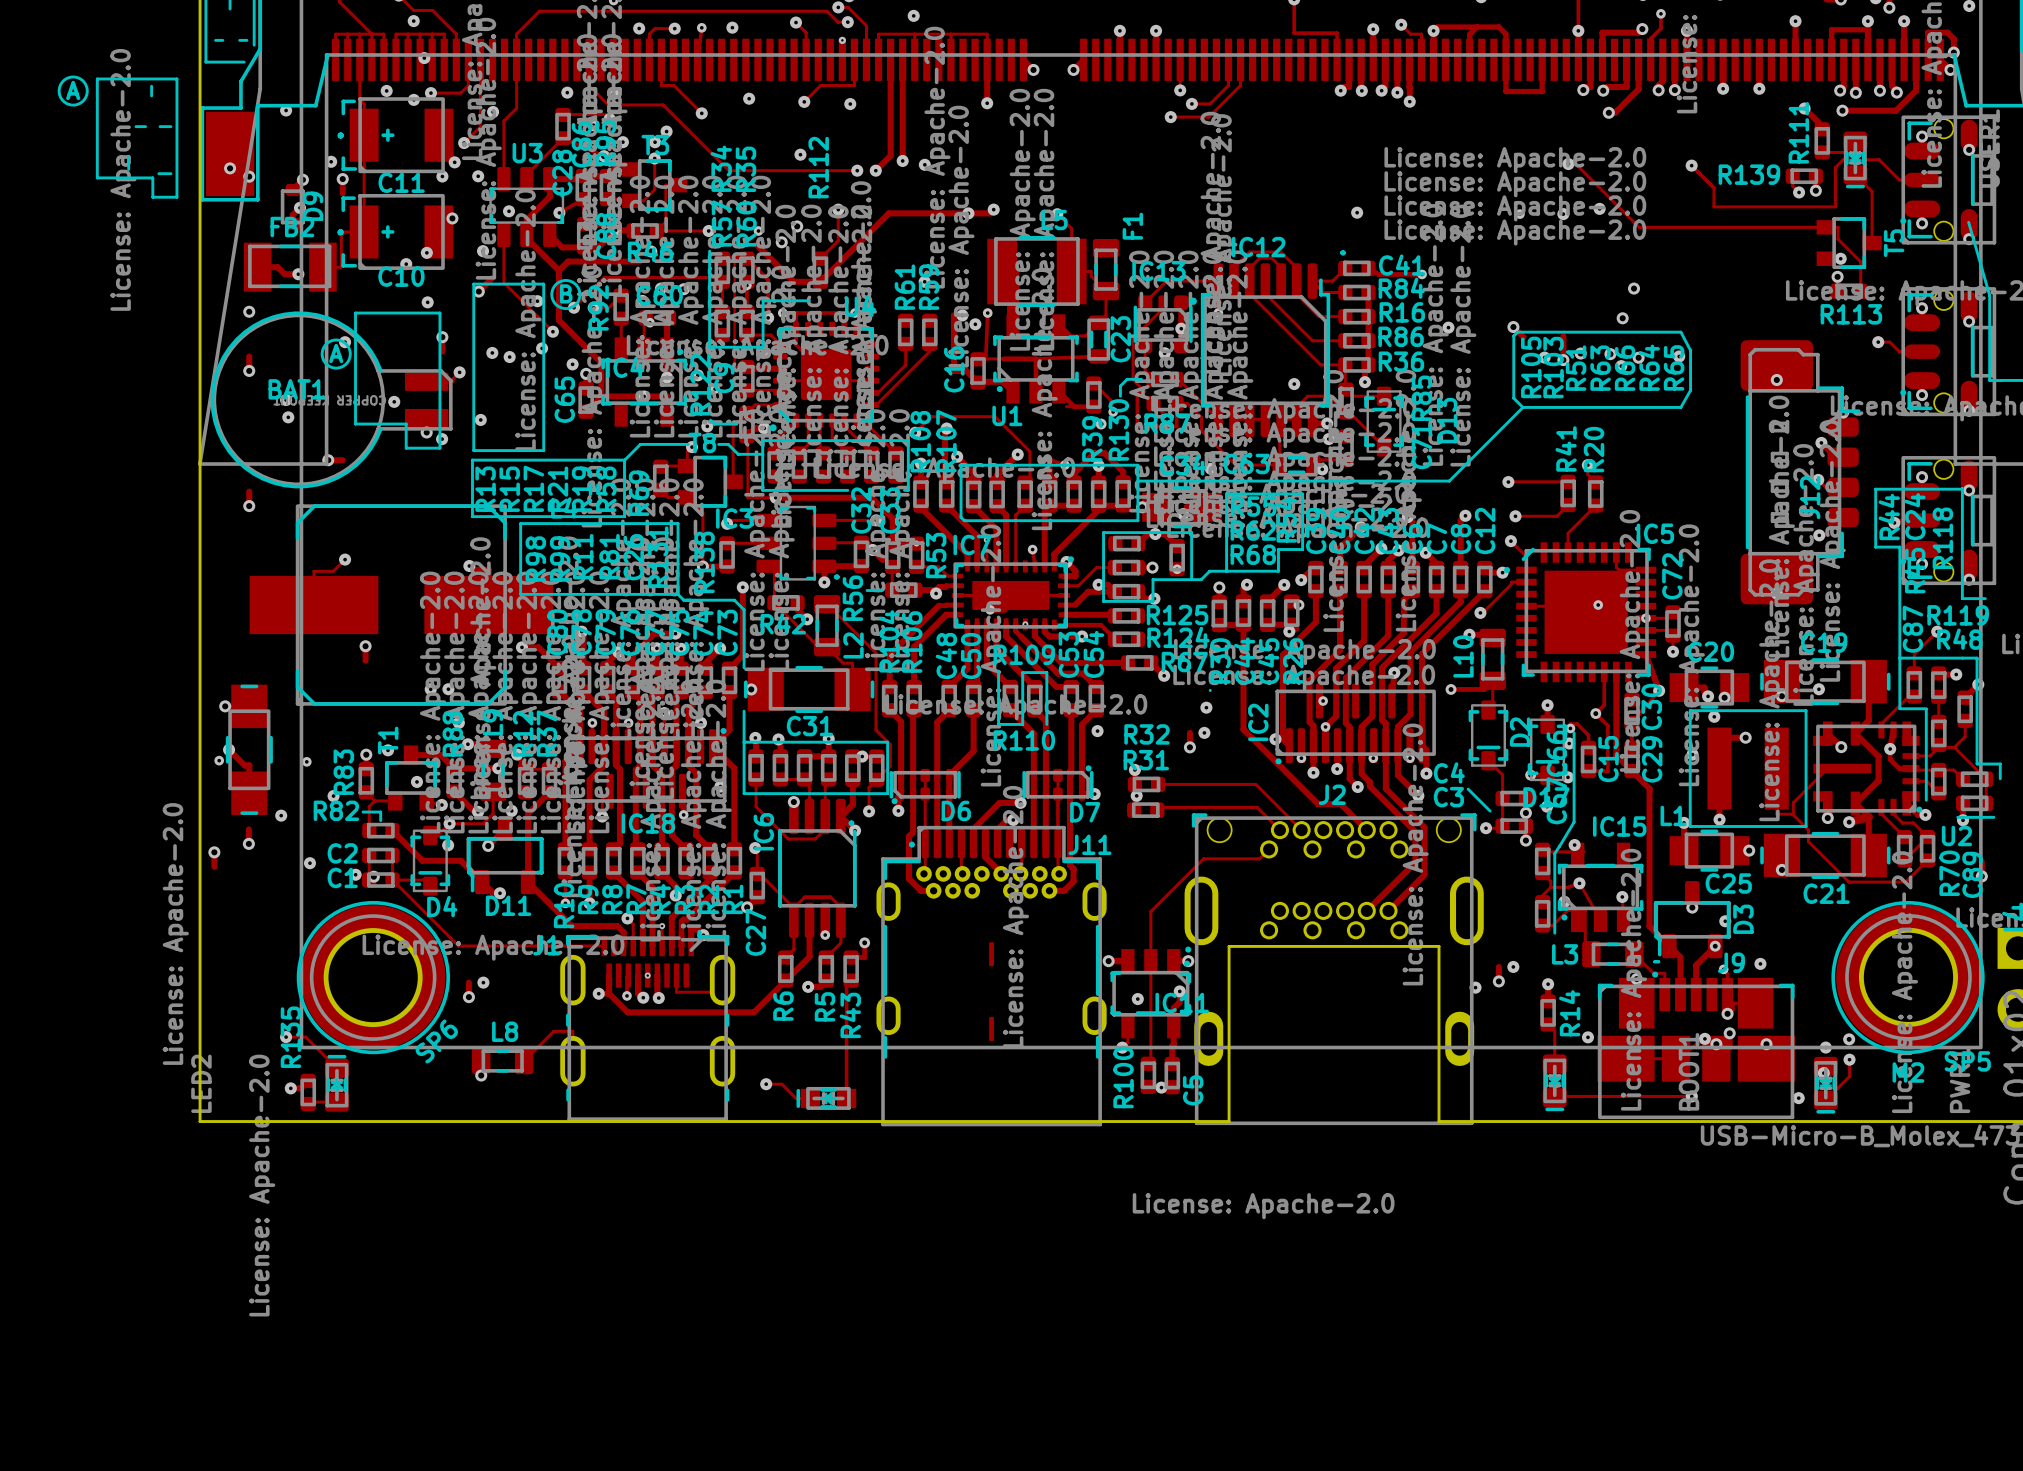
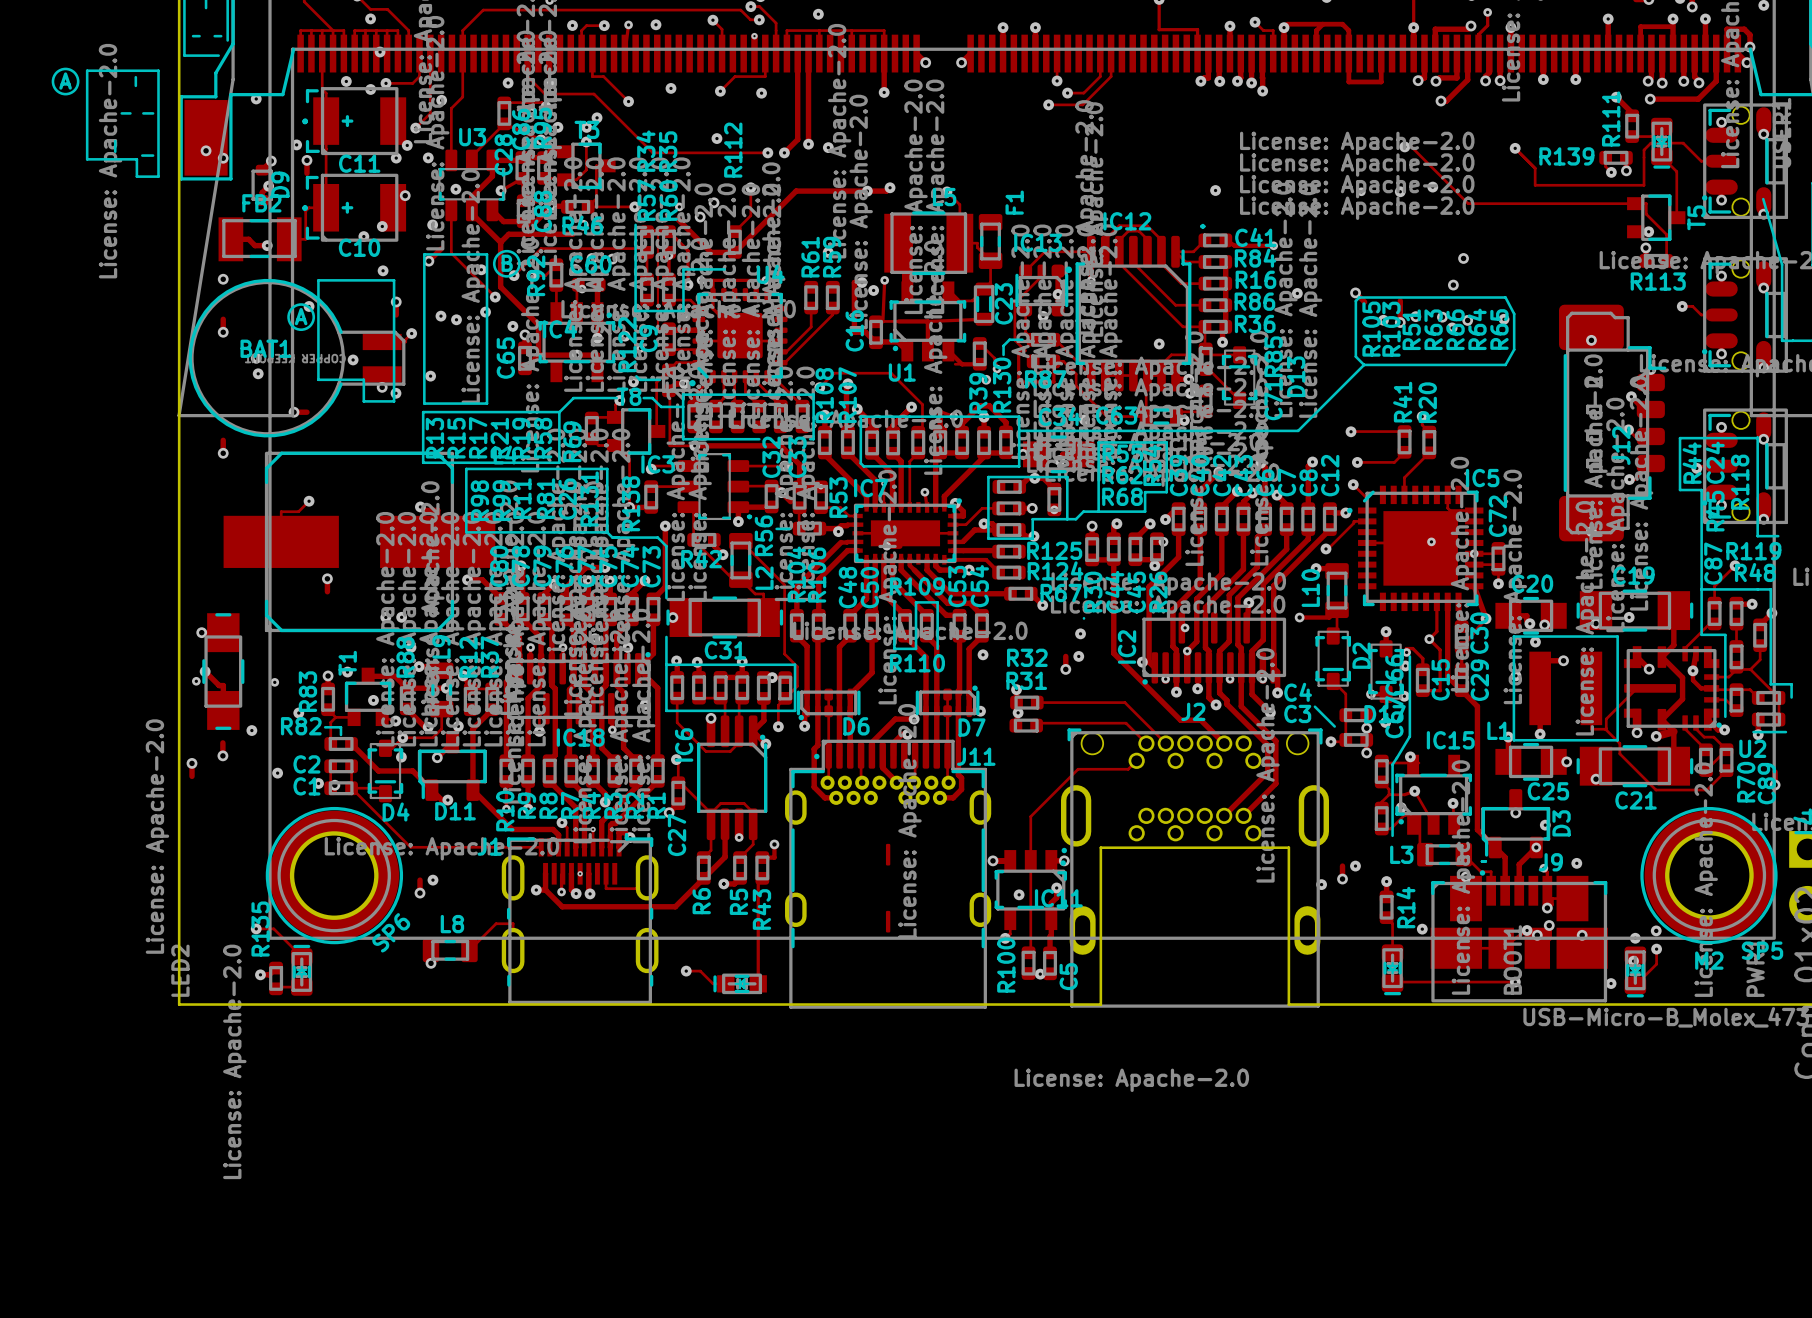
via: (1025, 624) -> none

